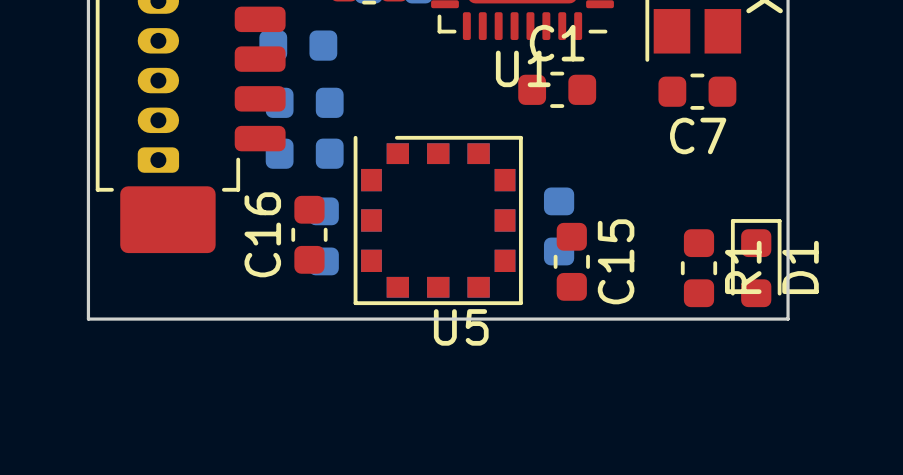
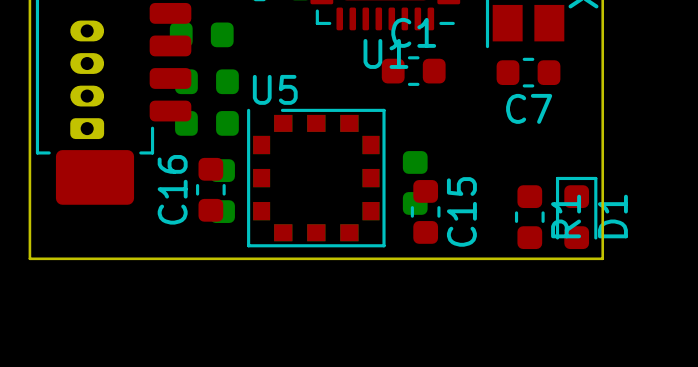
U5 name position: U5 (461, 327) -> U5 (275, 89)

